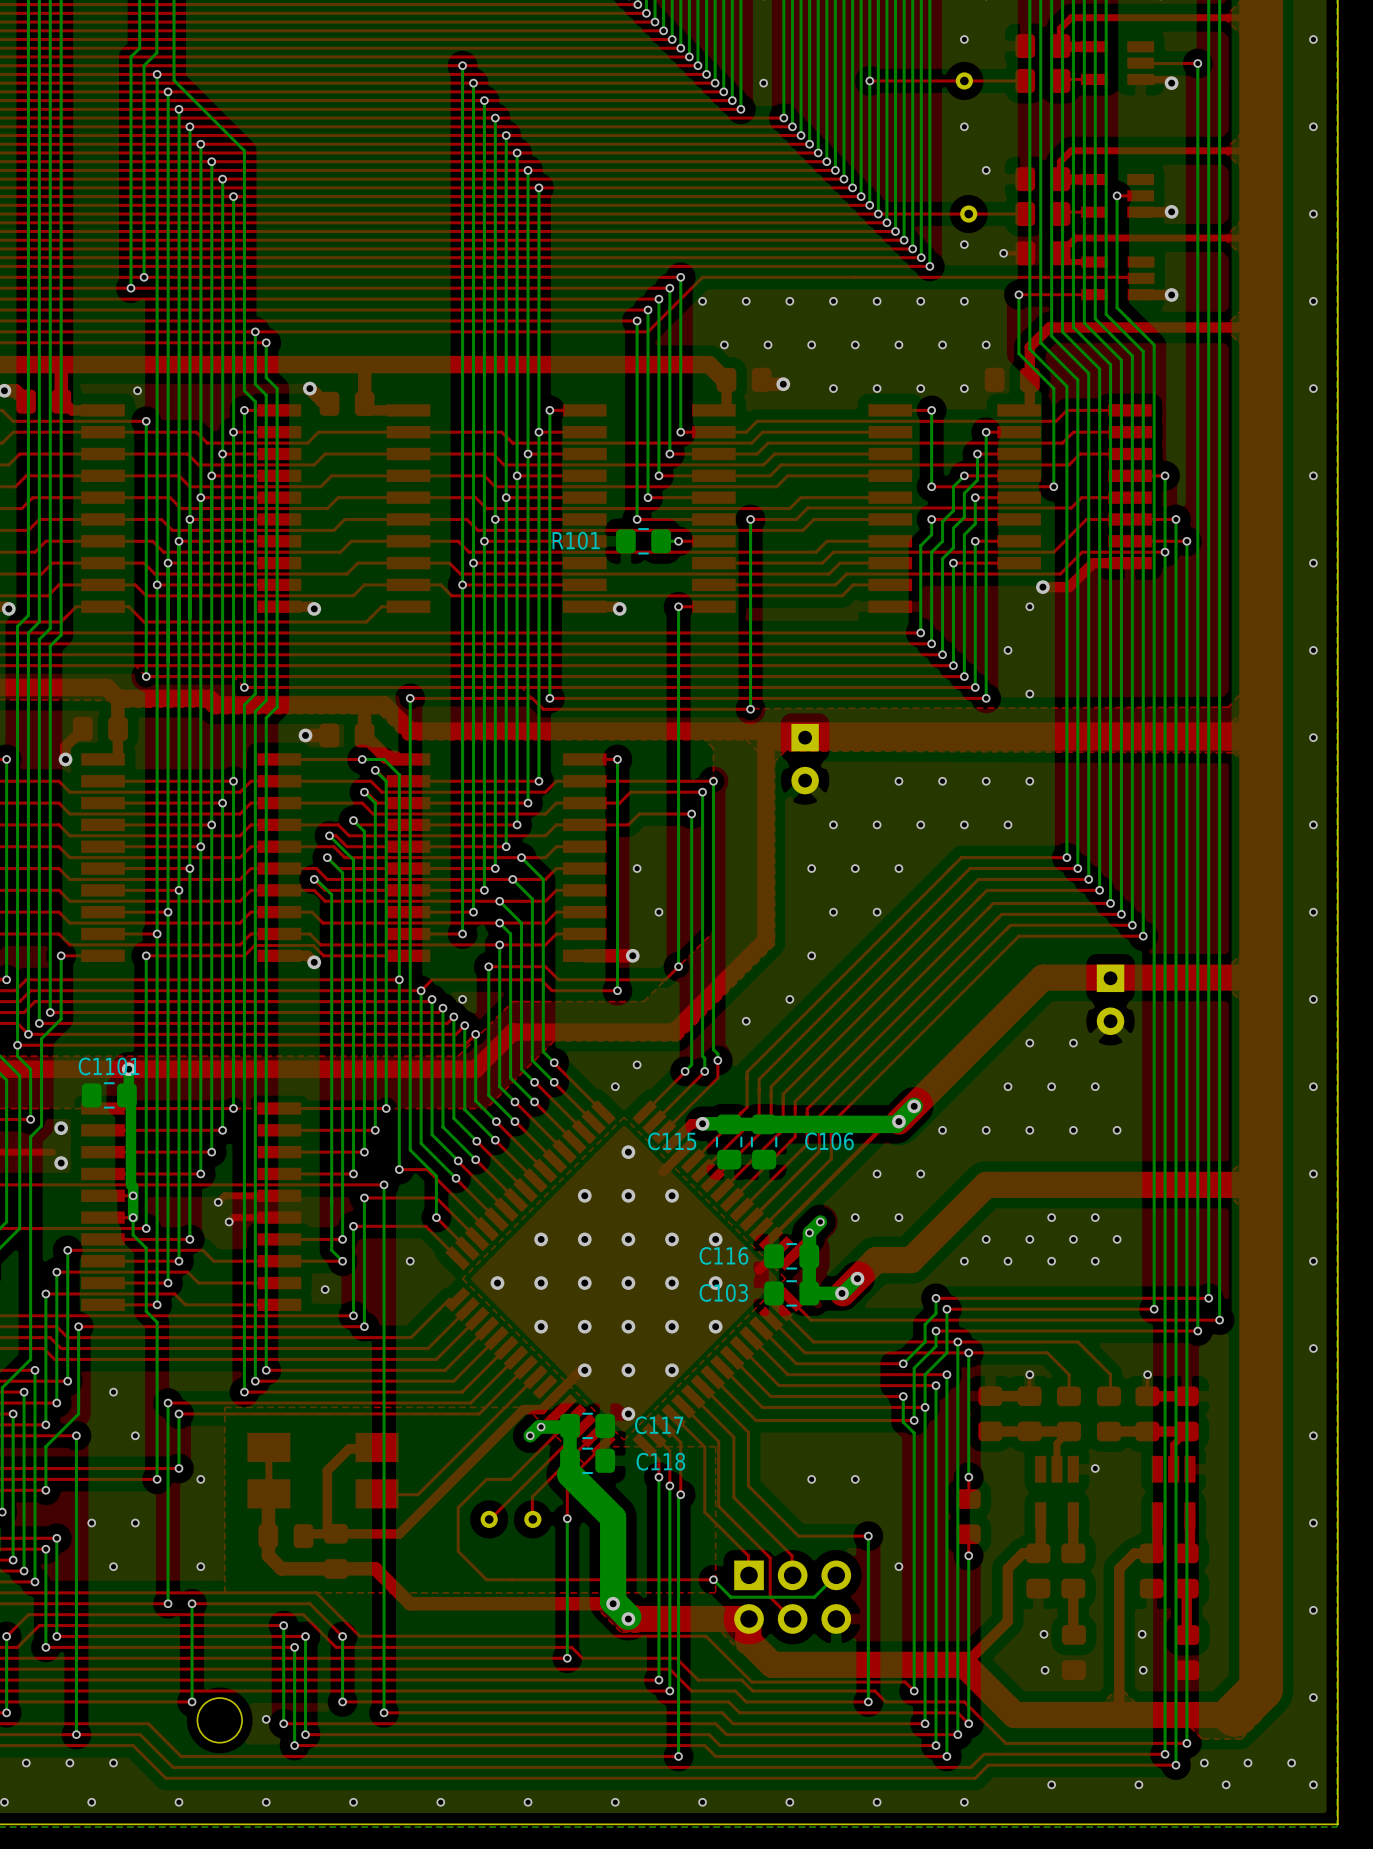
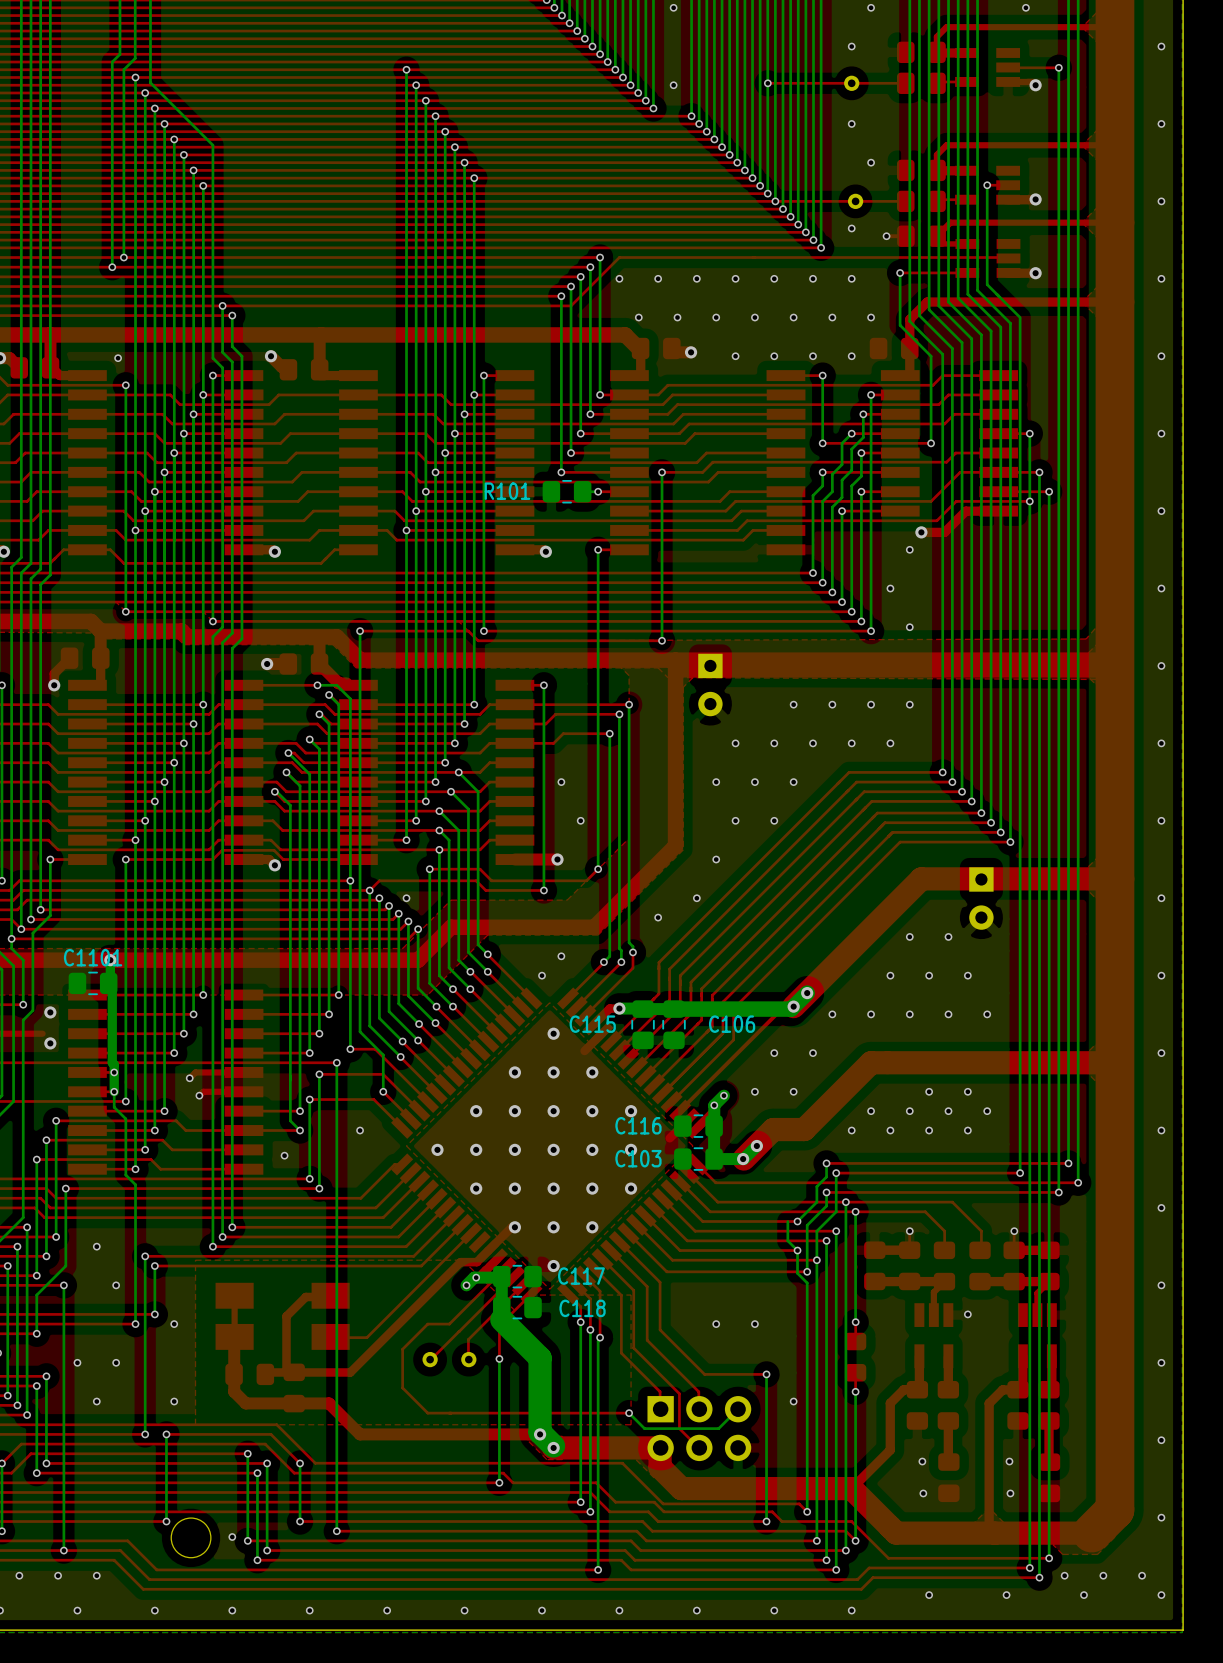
bottom track: none -> (787, 1221) (787, 1240) (797, 1250)

